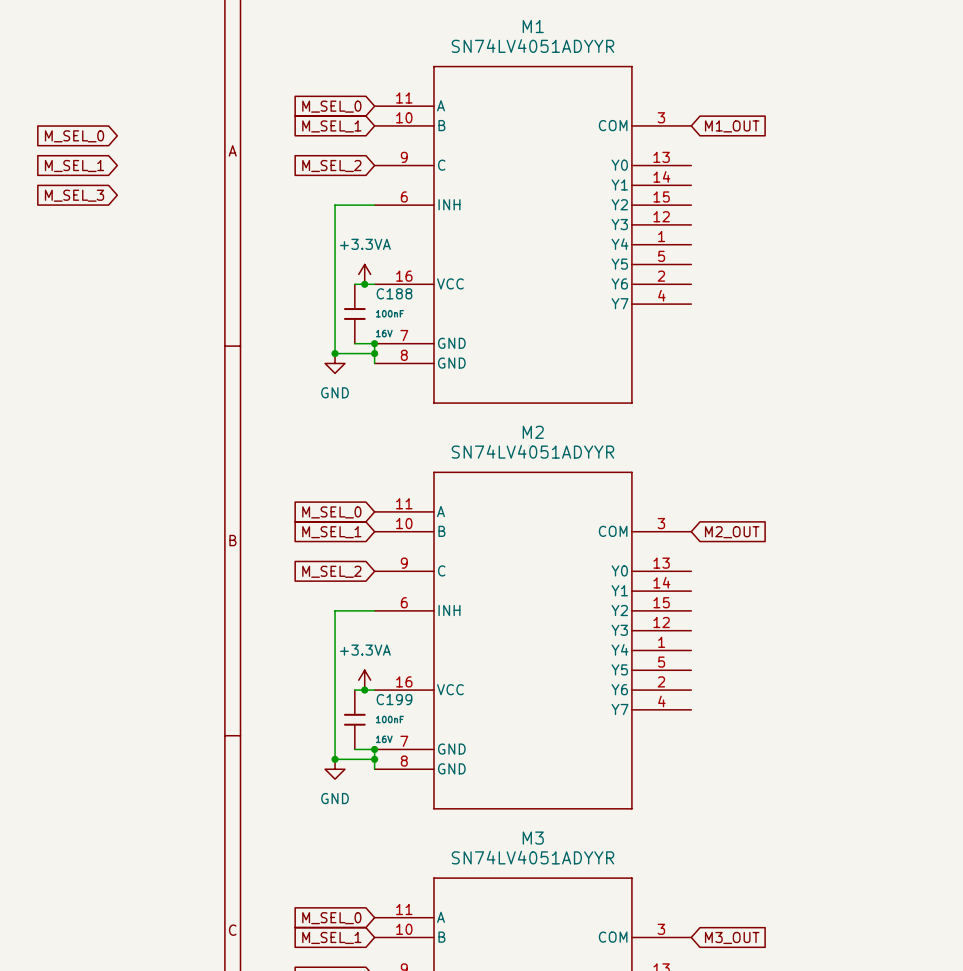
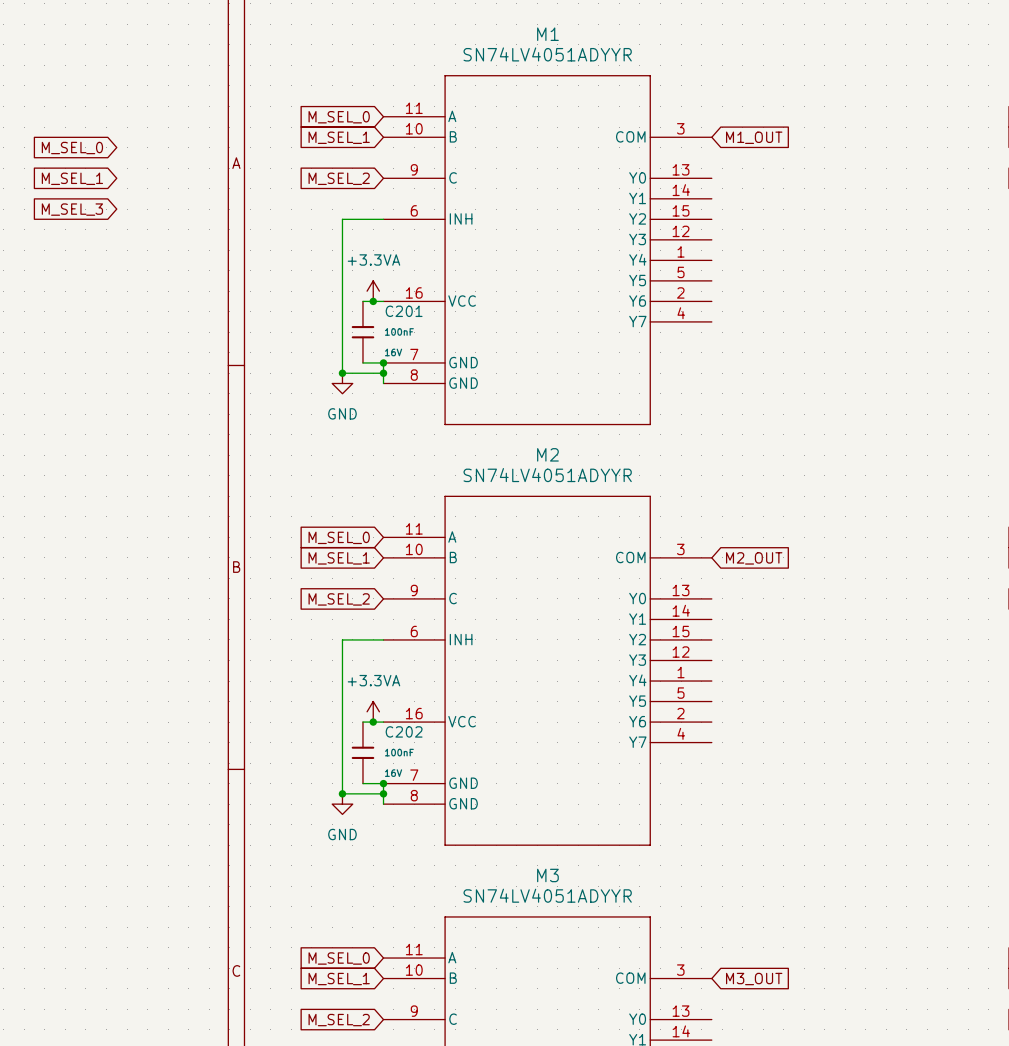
C188 name: C188 (394, 293) -> C201 (404, 311)
C199 name: C199 (394, 699) -> C202 (404, 731)

